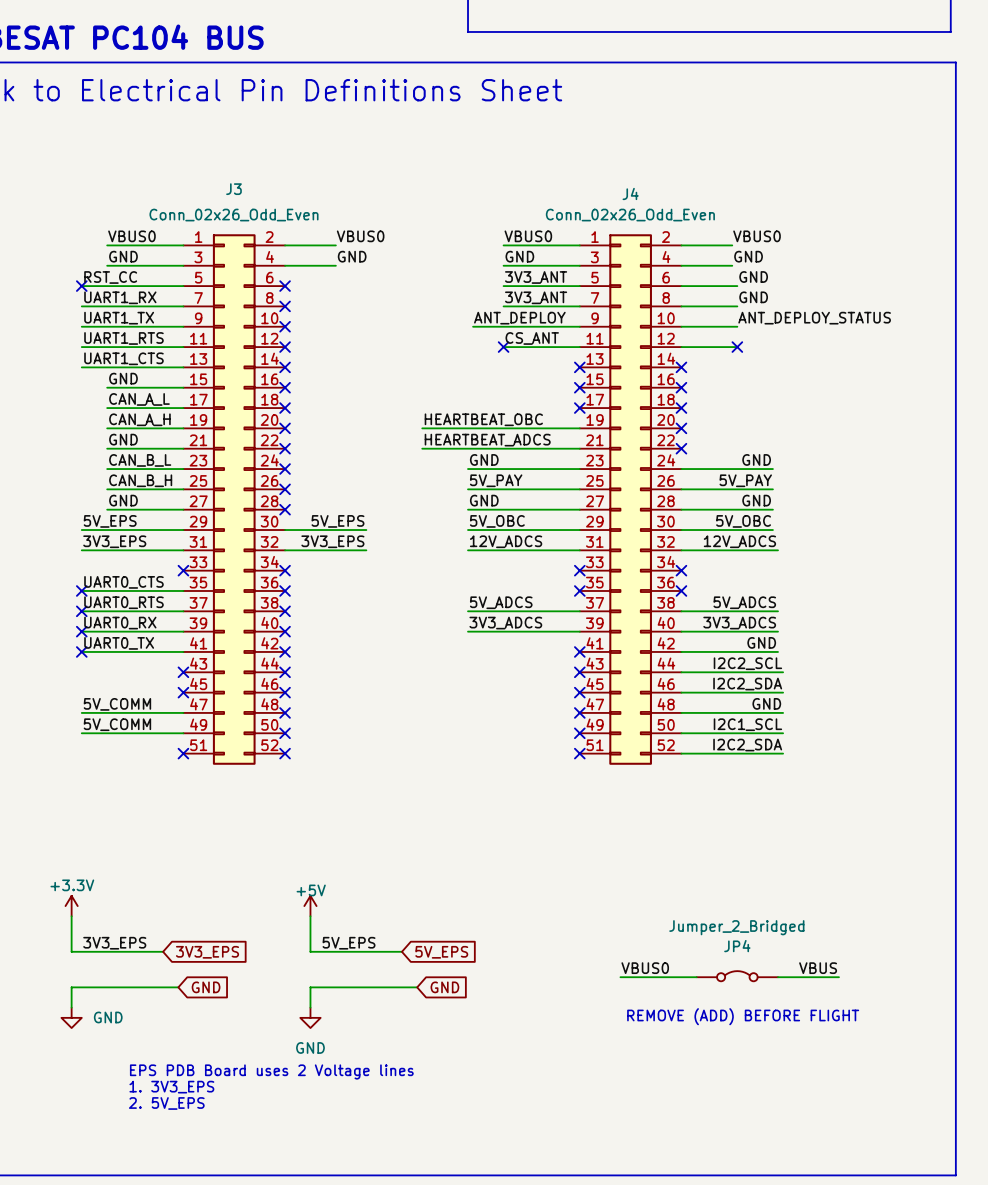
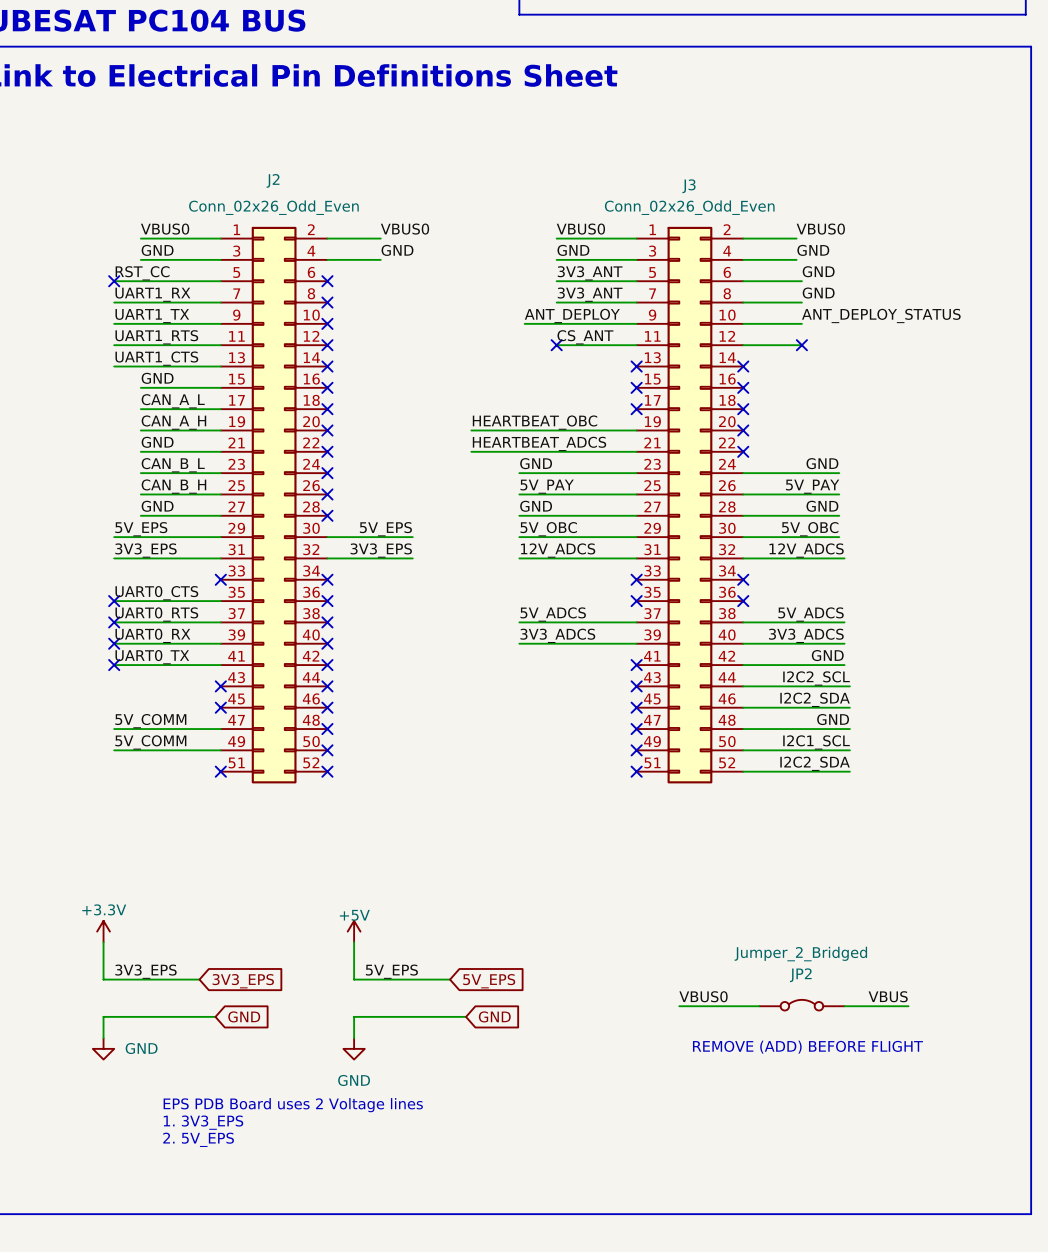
J3 name: J3 (234, 189) -> J2 (273, 180)
J4 name: J4 (630, 193) -> J3 (688, 186)
JP4 name: JP4 (737, 946) -> JP2 (800, 975)

